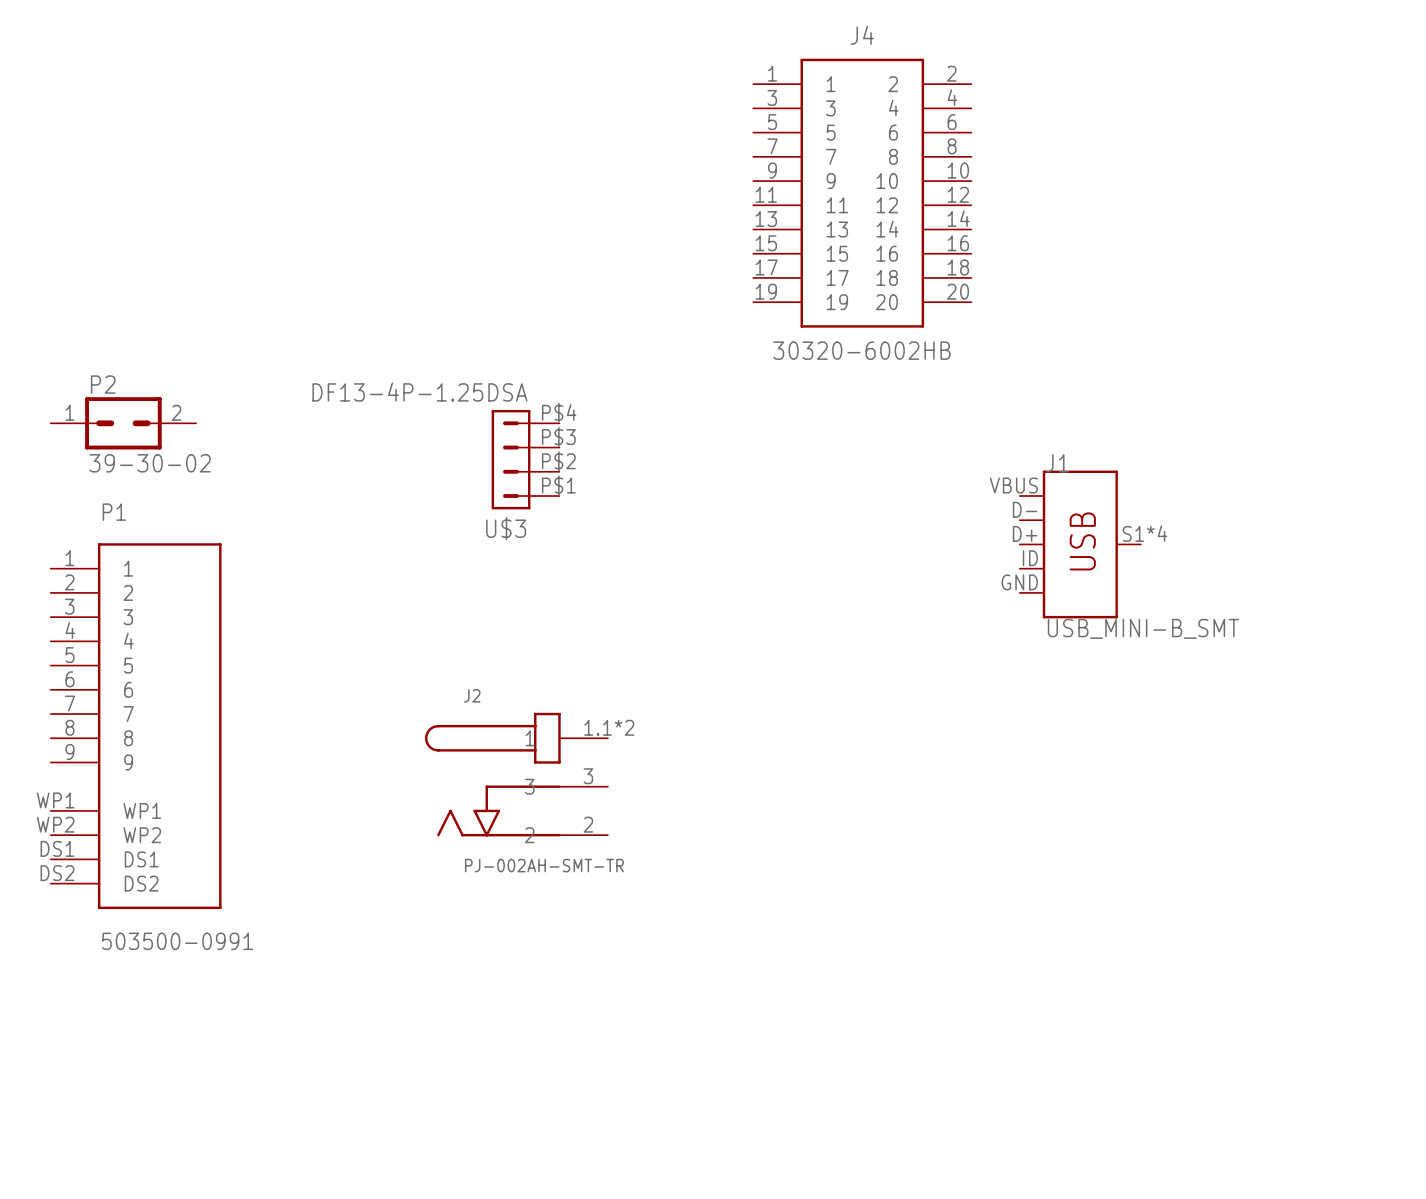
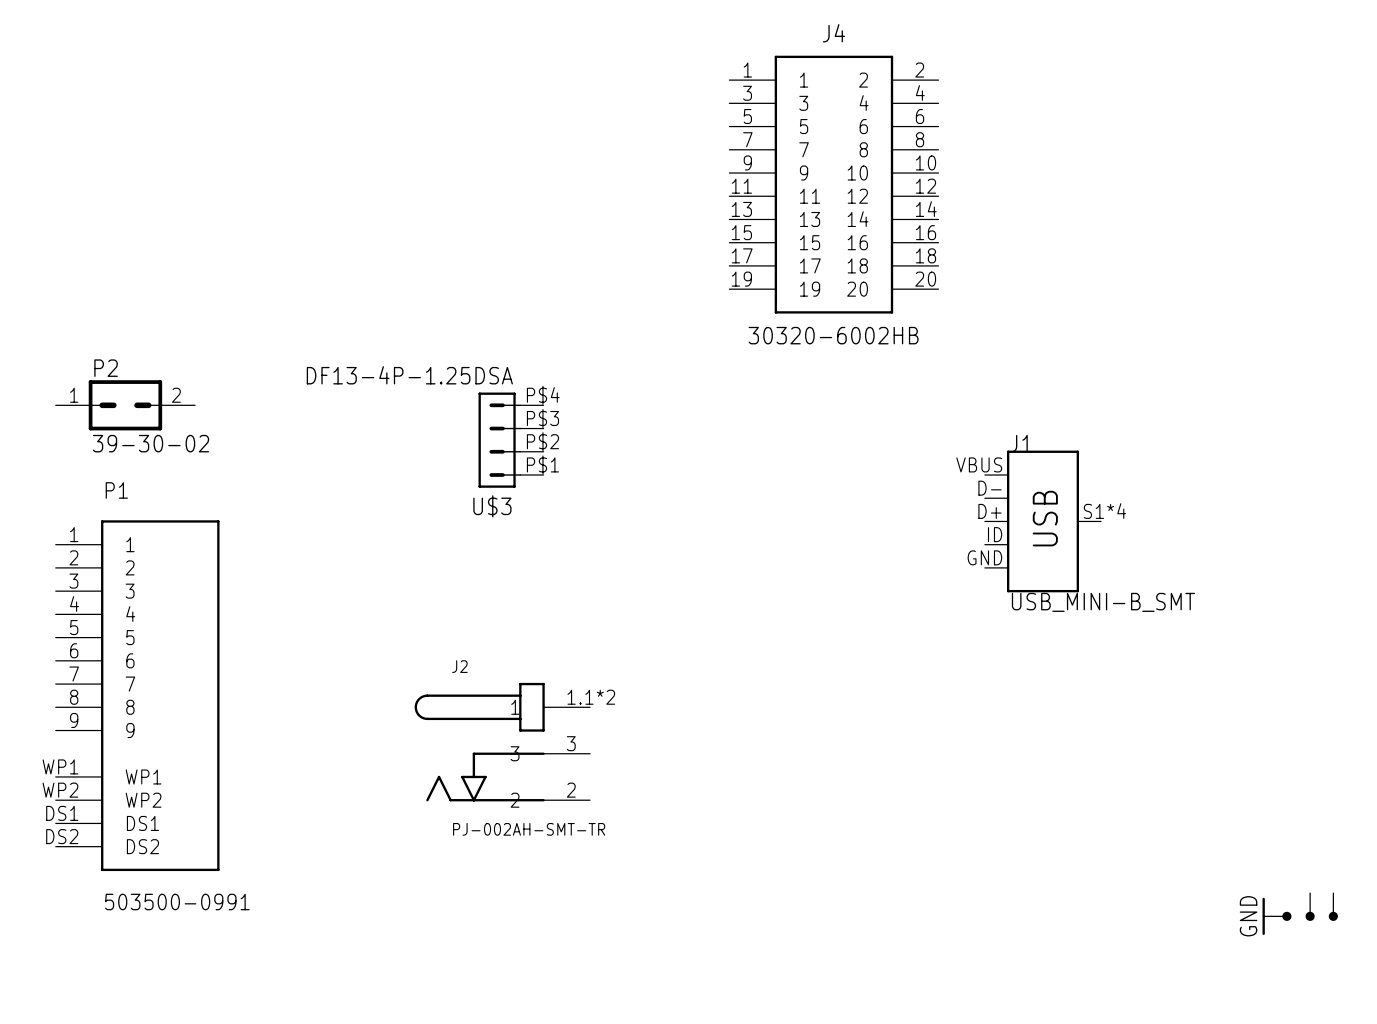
wire: none -> (1310, 893) (1310, 916)
wire: none -> (1333, 893) (1333, 916)
power symbol: none -> GND (1274, 916)
junction: none -> (1286, 916)
junction: none -> (1310, 916)
junction: none -> (1333, 916)

